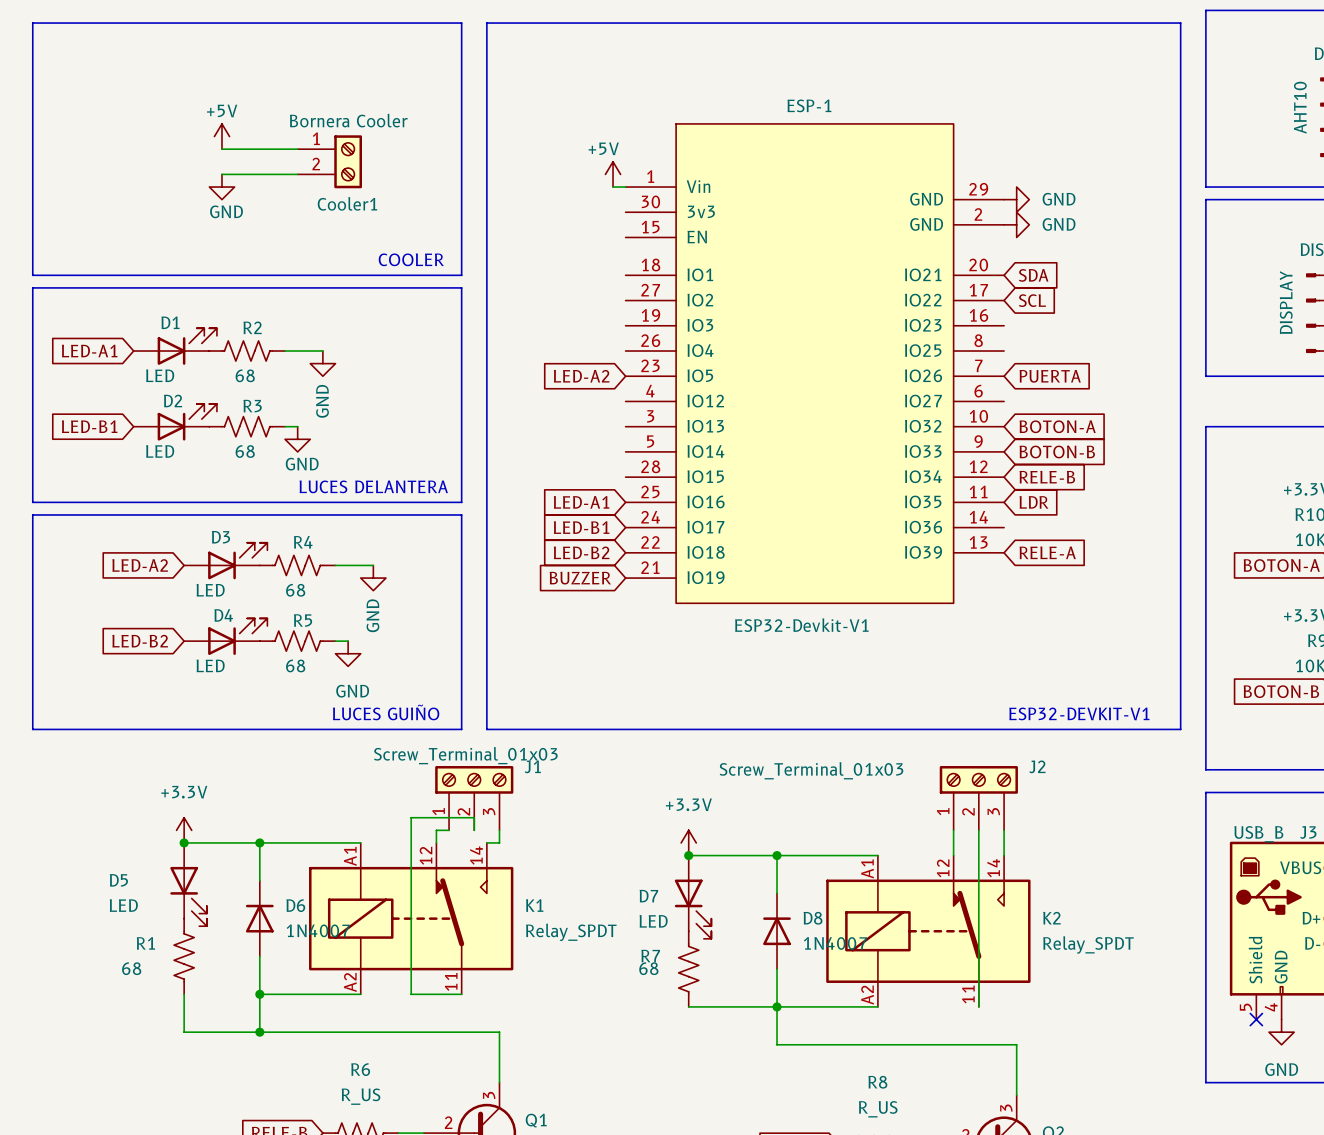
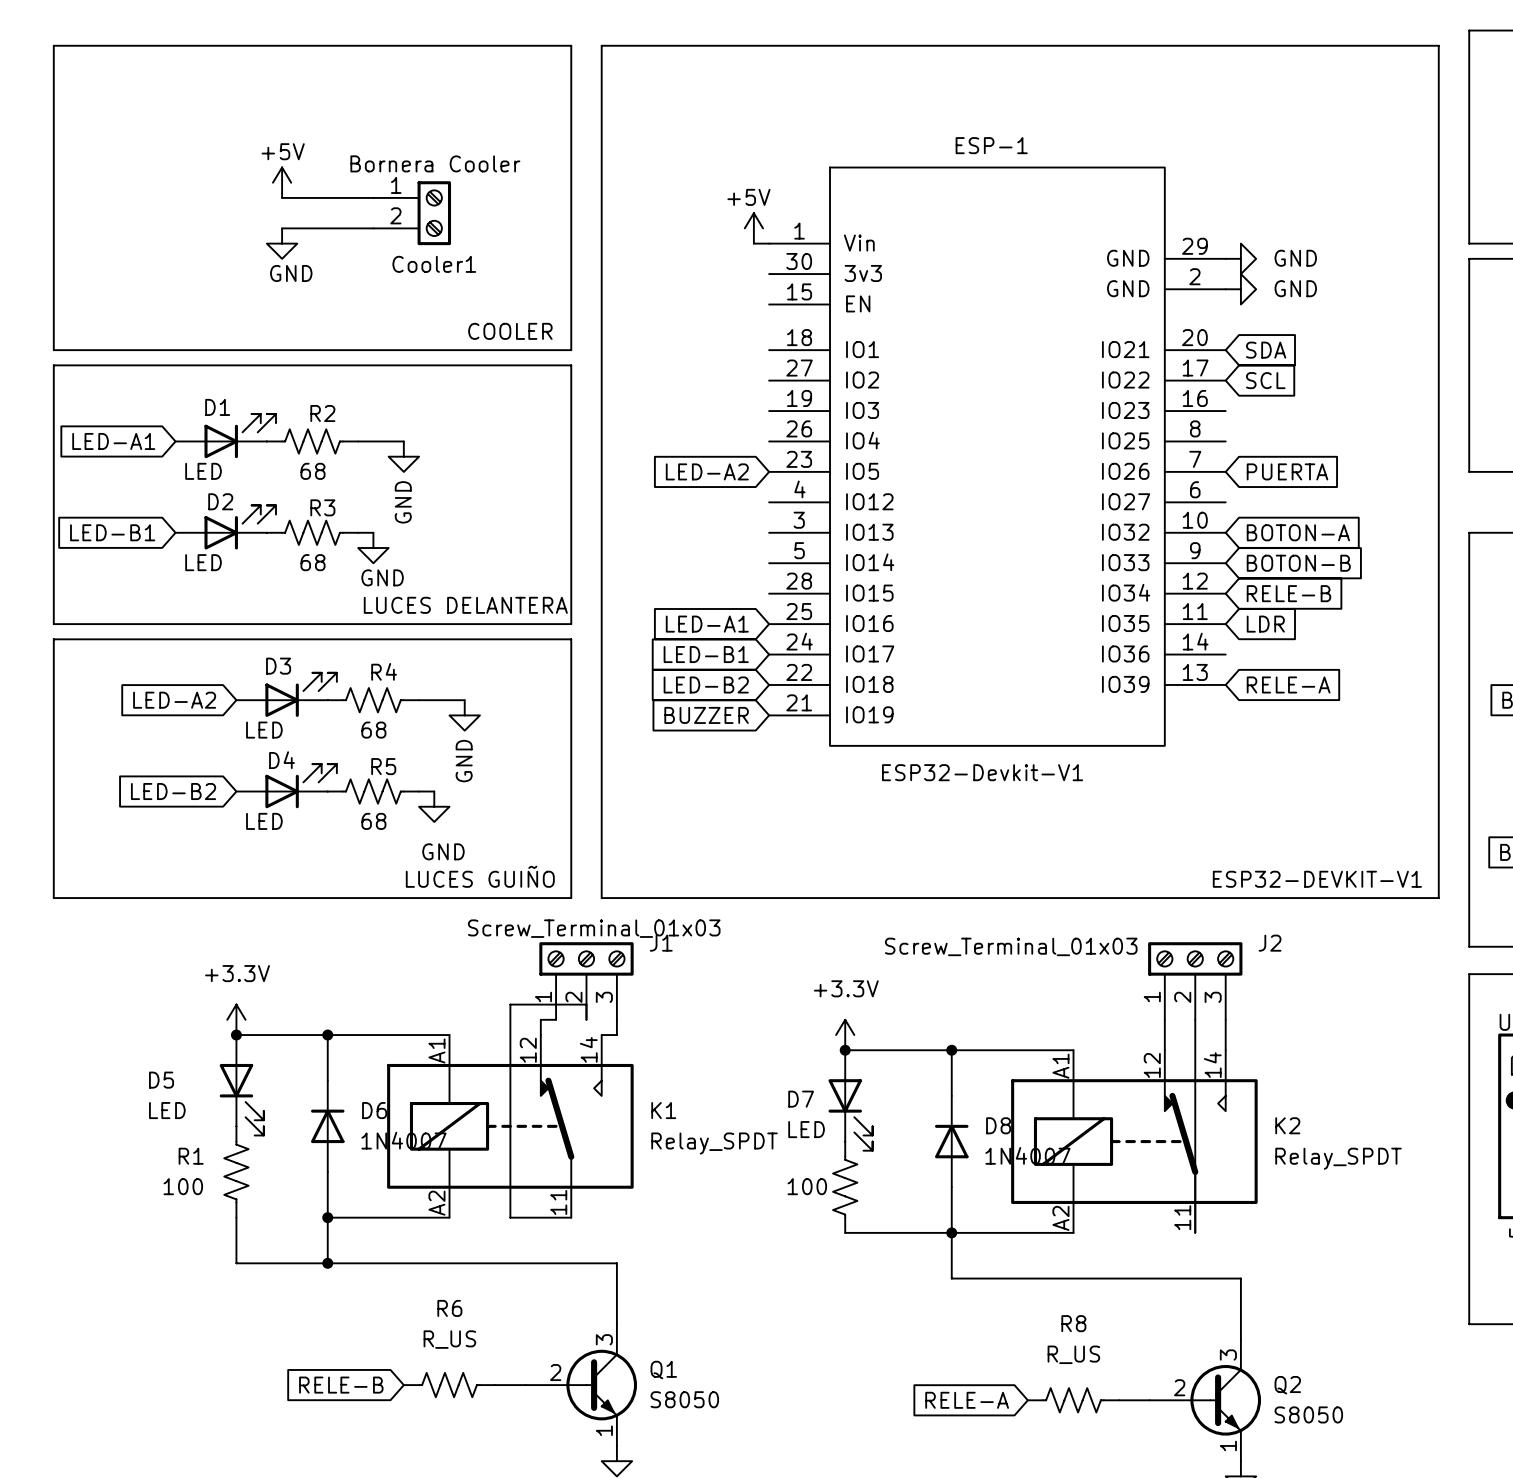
R7 name: R7 (650, 956) -> none
R1 value: 68 (131, 968) -> 100 (183, 1186)
R7 value: 68 (648, 968) -> 100 (807, 1186)

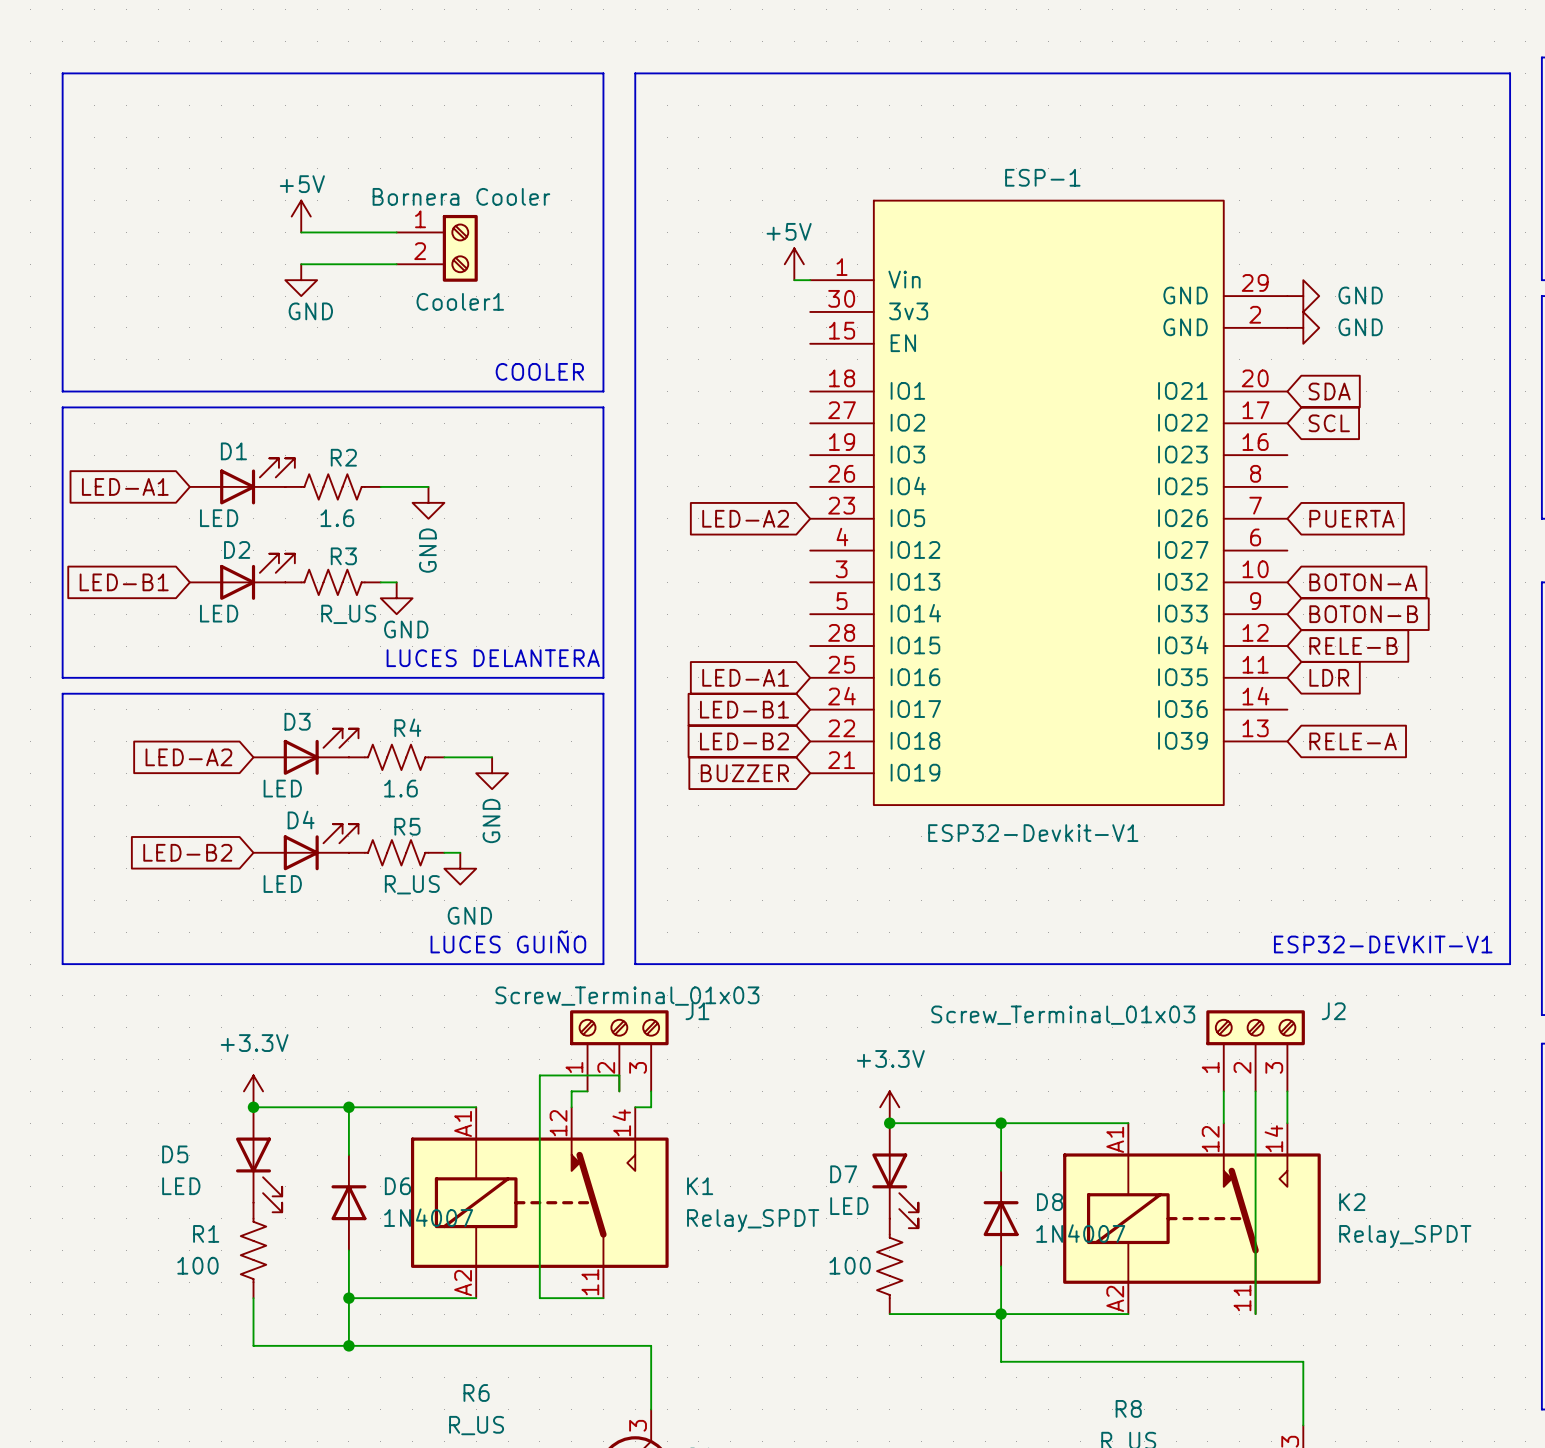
R2 value: 68 (313, 471) -> 1.6 (337, 518)
R3 value: 68 (313, 562) -> R_US (348, 614)
R4 value: 68 (373, 730) -> 1.6 (400, 788)
R5 value: 68 (373, 821) -> R_US (412, 884)

